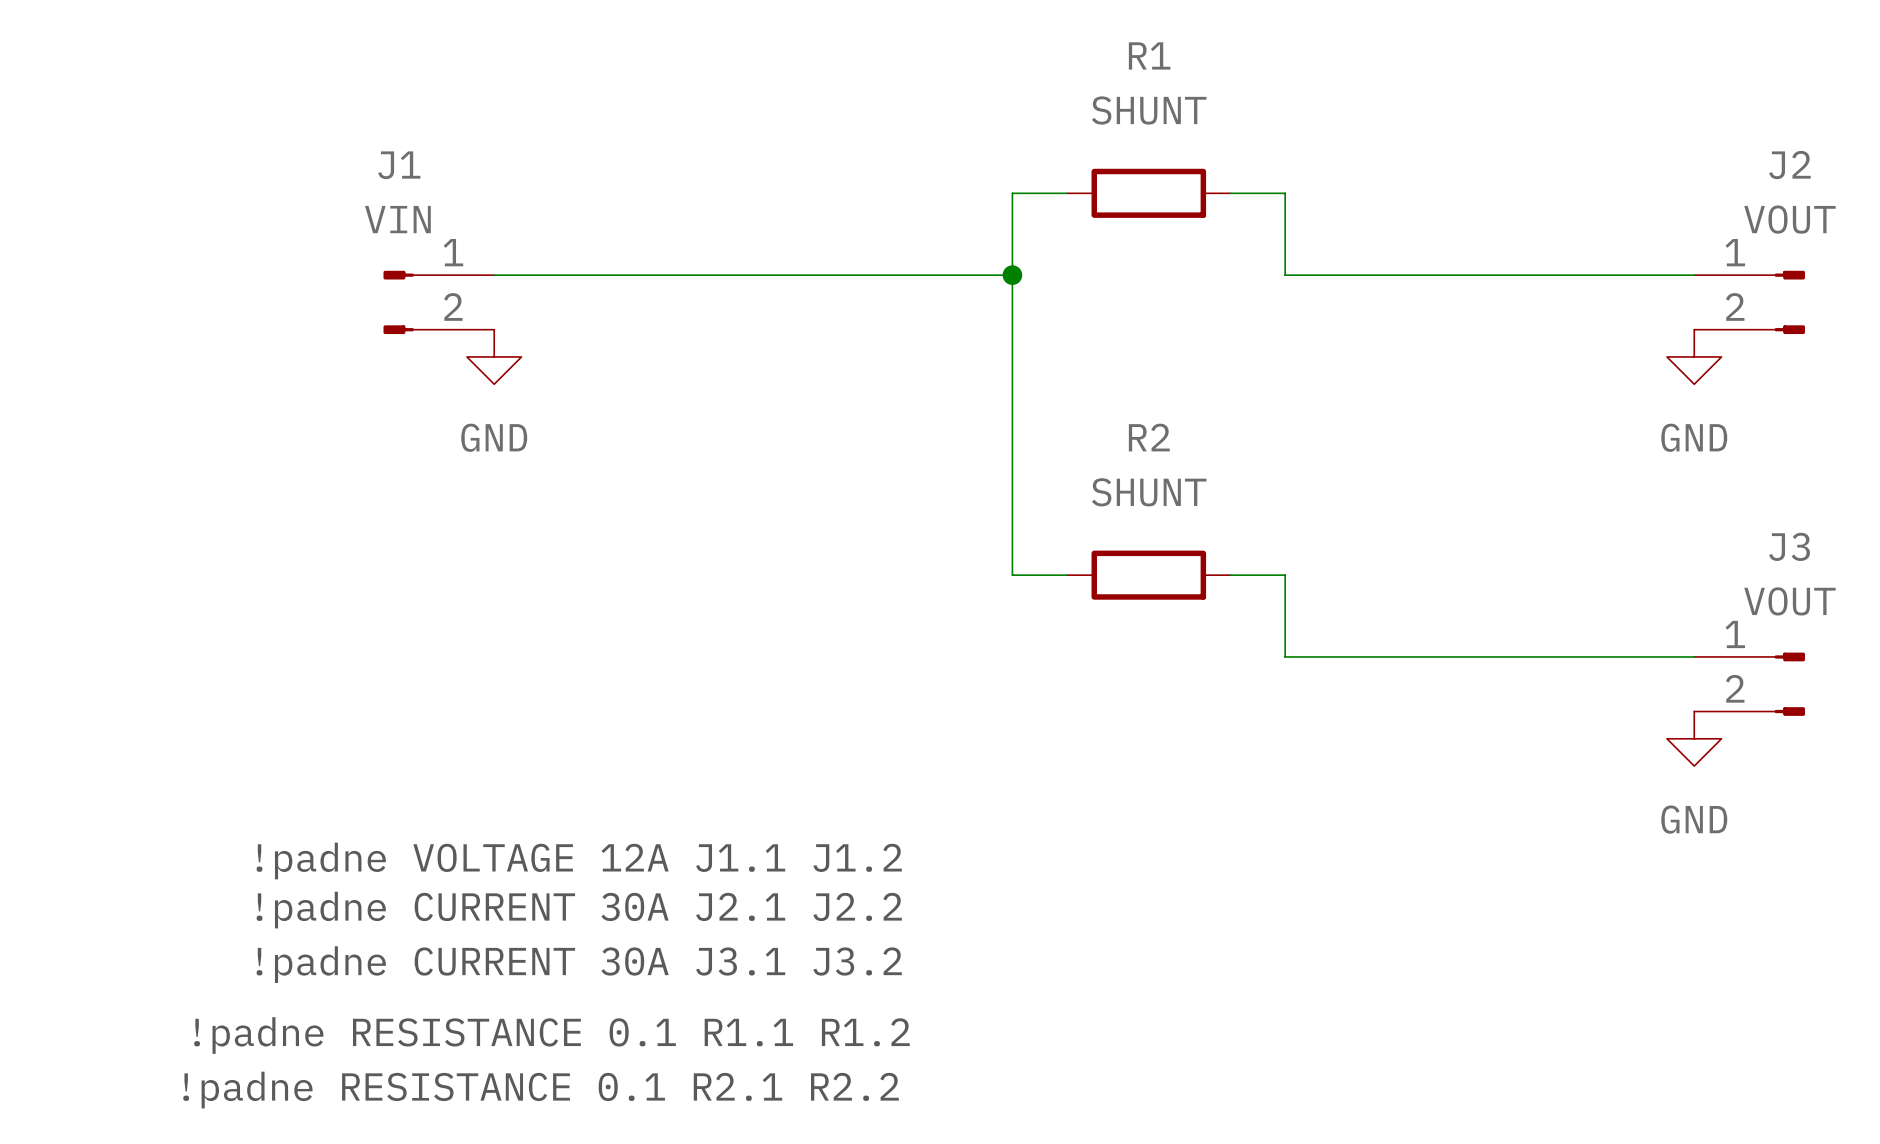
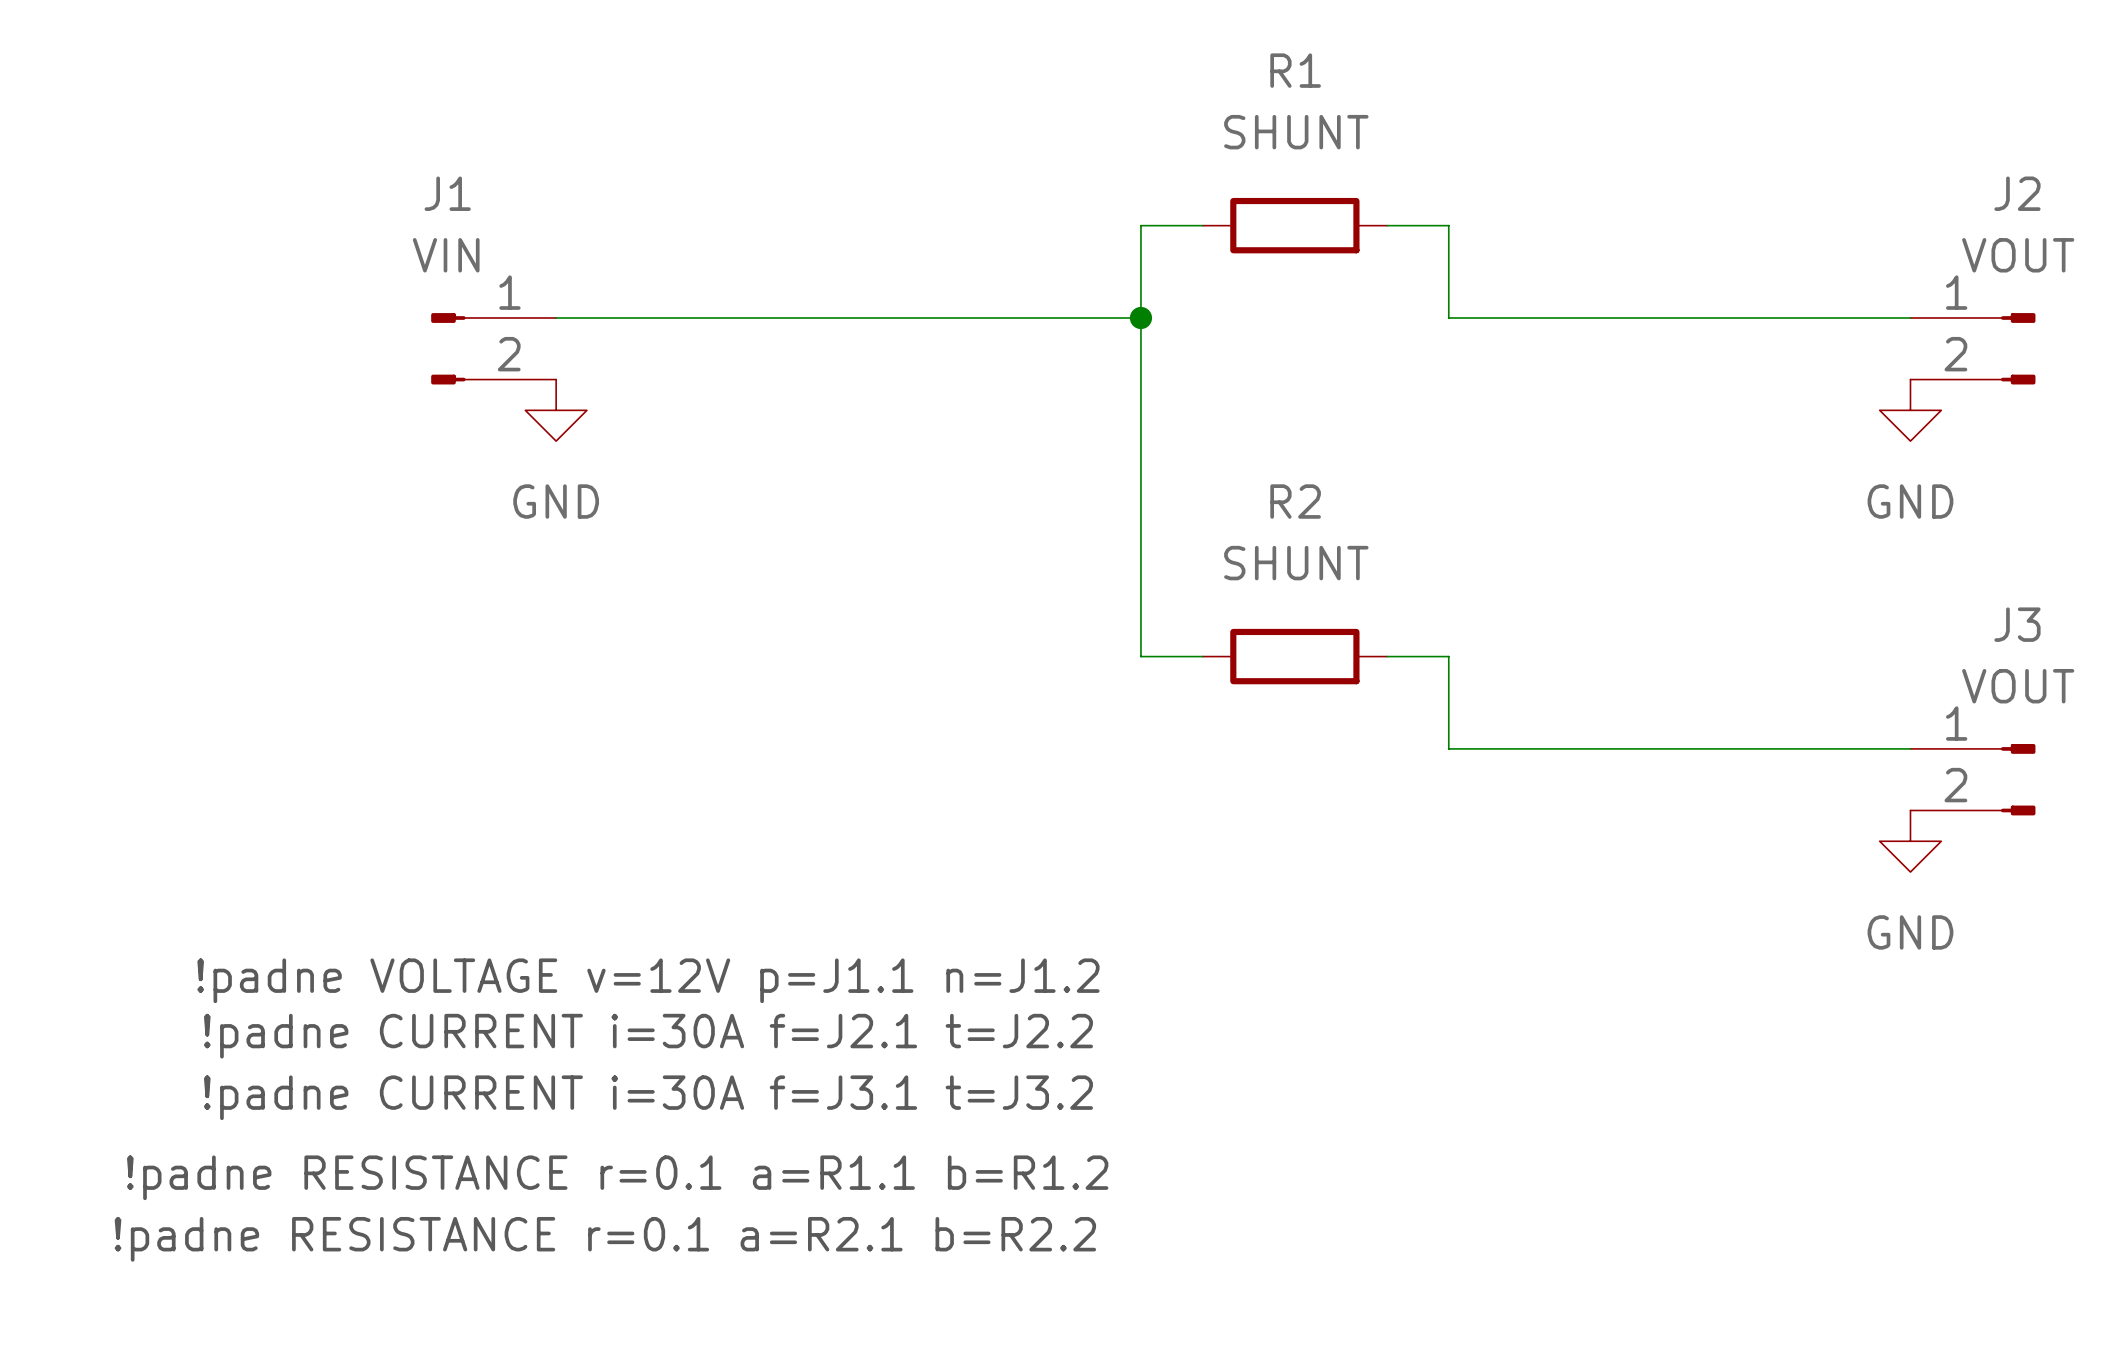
text: !padne VOLTAGE 12A J1.1 J1.2 (579, 860) -> !padne VOLTAGE v=12V p=J1.1 n=J1.2 (648, 980)
text: !padne CURRENT 30A J2.1 J2.2 (579, 910) -> !padne CURRENT i=30A f=J2.1 t=J2.2 (648, 1036)
text: !padne CURRENT 30A J3.1 J3.2 (579, 964) -> !padne CURRENT i=30A f=J3.1 t=J3.2 (648, 1097)
text: !padne RESISTANCE 0.1 R1.1 R1.2 (551, 1035) -> !padne RESISTANCE r=0.1 a=R1.1 b=R1.2 (617, 1177)
text: !padne RESISTANCE 0.1 R2.1 R2.2 (541, 1090) -> !padne RESISTANCE r=0.1 a=R2.1 b=R2.2 (605, 1239)

